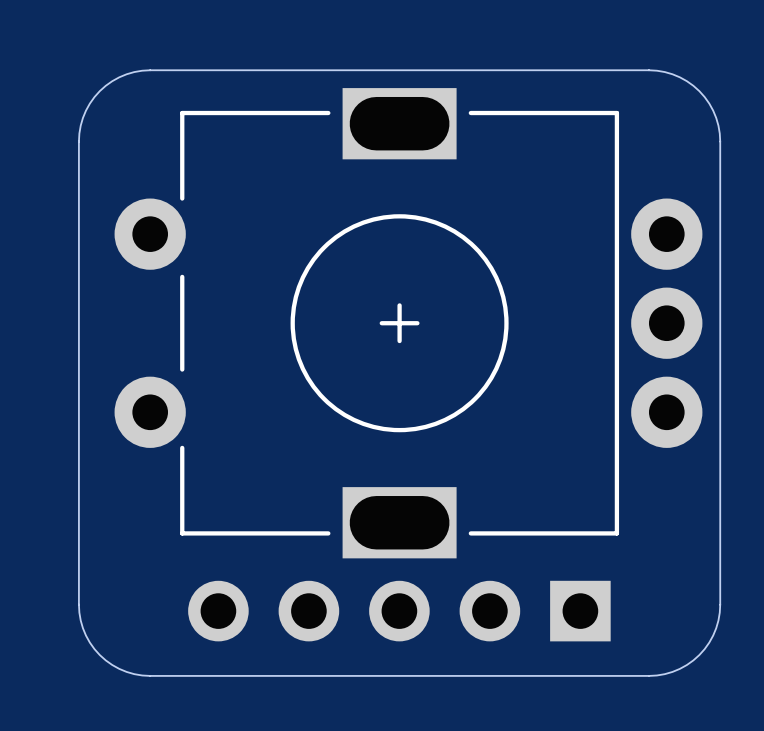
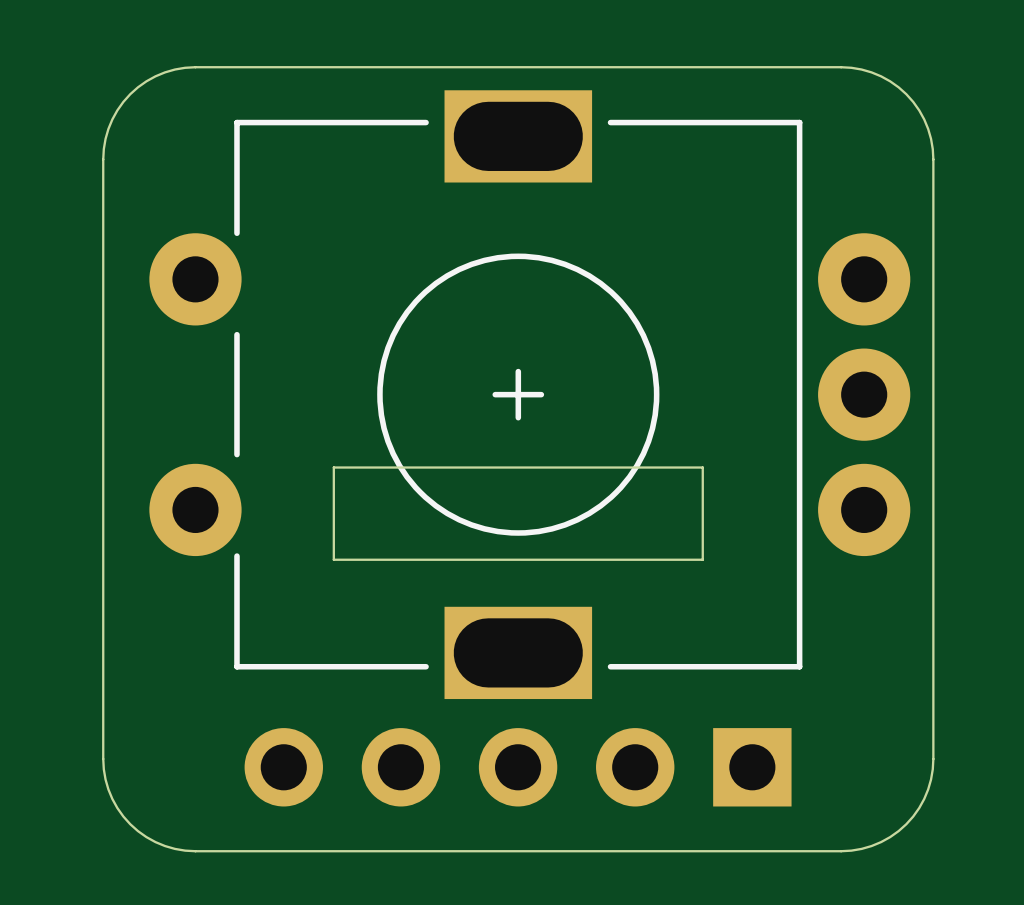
board edge: none -> (702, 467) (702, 559) (333, 559) (333, 467) (702, 467)

